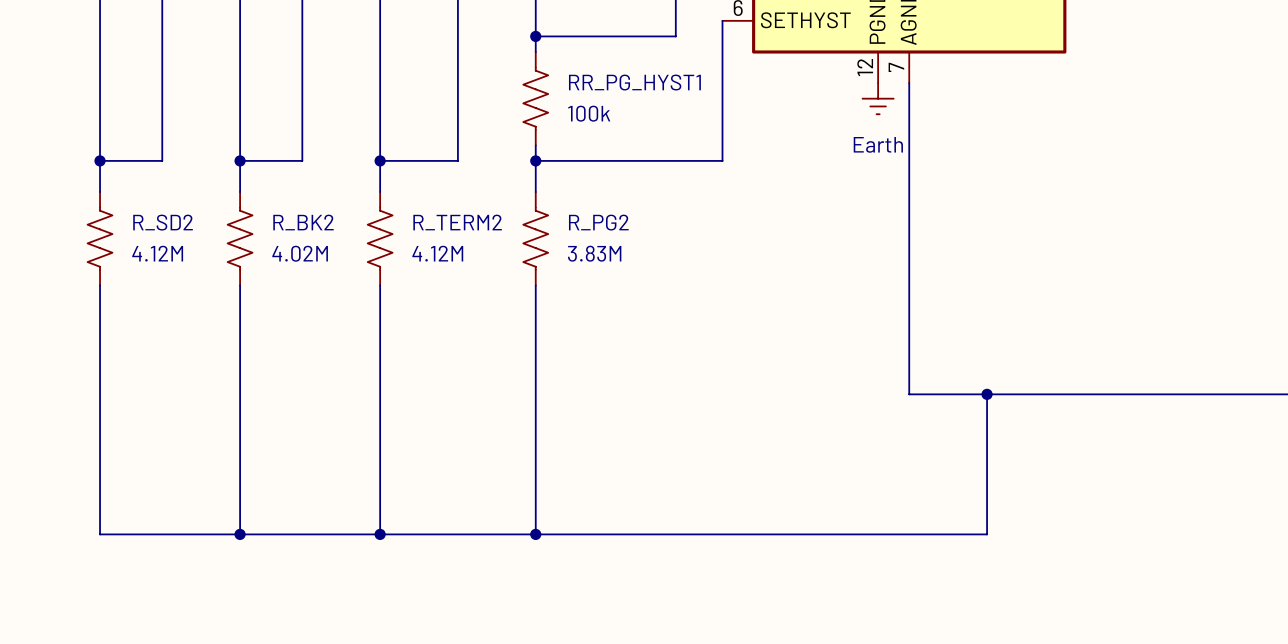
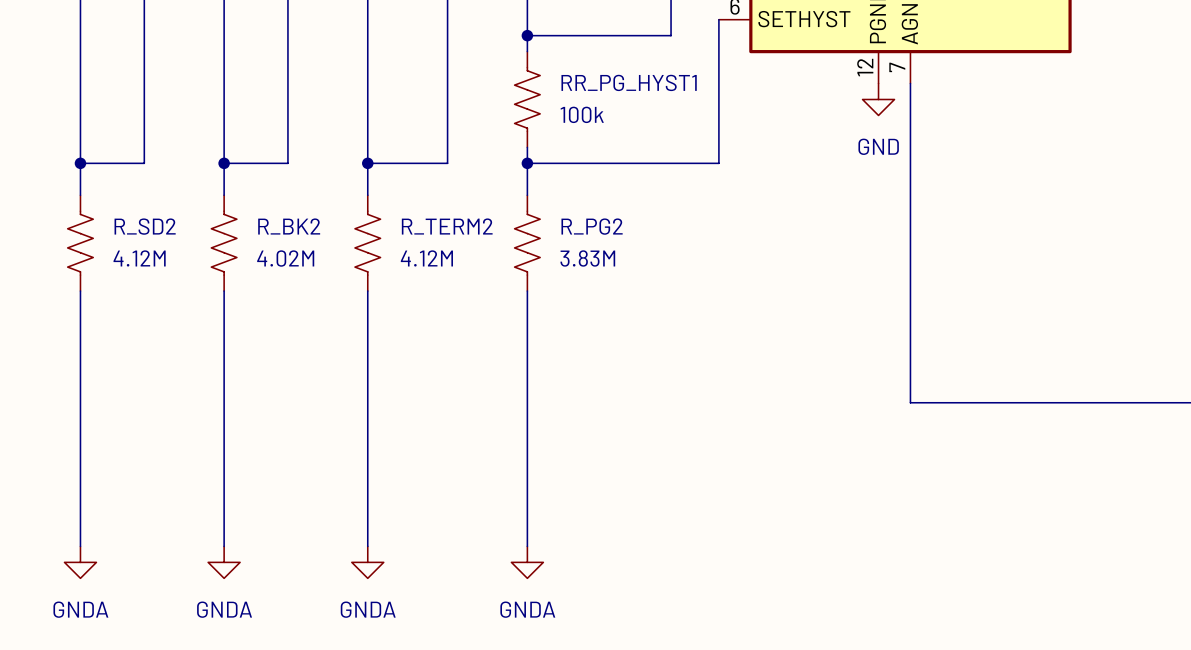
power symbol: Earth (878, 98) -> GND (878, 99)
wire: (987, 394) (987, 534) (100, 534) -> none
junction: (987, 394) -> none
junction: (240, 534) -> none
junction: (380, 534) -> none
junction: (535, 534) -> none
power symbol: none -> GNDA (80, 562)
power symbol: none -> GNDA (224, 562)
power symbol: none -> GNDA (367, 562)
power symbol: none -> GNDA (527, 562)

